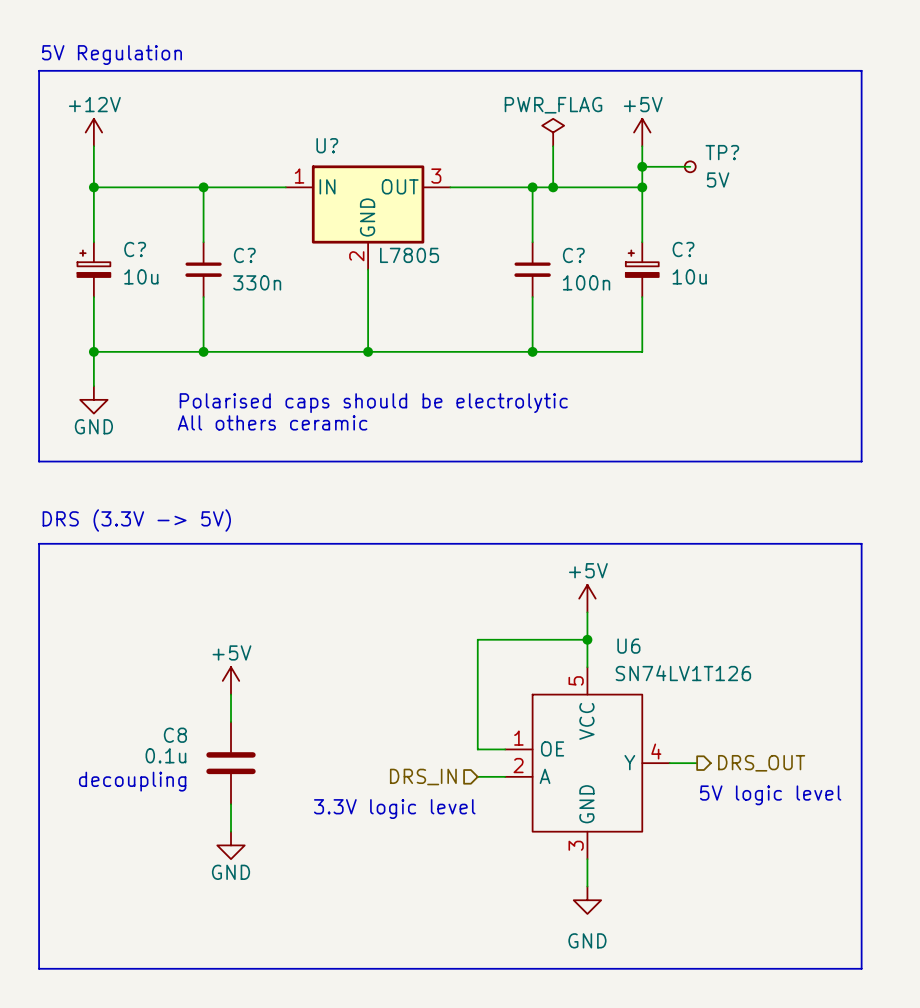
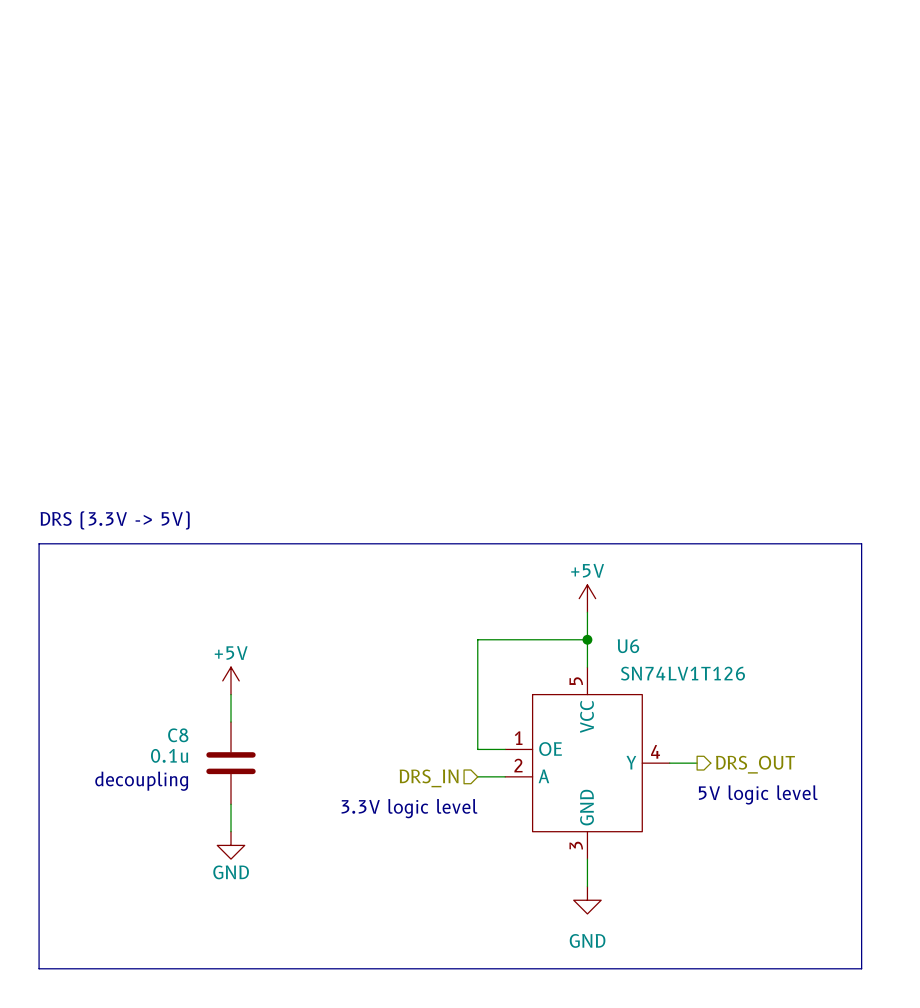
text: 5V Regulation (111, 55) -> none
line: (39, 70) (39, 461) (861, 461) (861, 70) (39, 70) -> none
power symbol: +12V (93, 132) -> none
power symbol: PWR_FLAG (553, 132) -> none
power symbol: +5V (642, 132) -> none
wire: (93, 146) (93, 242) -> none
wire: (553, 146) (553, 187) -> none
wire: (642, 146) (642, 242) -> none
wire: (642, 166) (690, 166) -> none
junction: (642, 166) -> none
TP?: 5V (690, 166) -> none
wire: (93, 187) (285, 187) -> none
junction: (93, 187) -> none
wire: (203, 187) (203, 242) -> none
junction: (203, 187) -> none
wire: (450, 187) (642, 187) -> none
wire: (532, 187) (532, 242) -> none
junction: (532, 187) -> none
junction: (553, 187) -> none
junction: (642, 187) -> none
U?: L7805 (368, 217) -> none
C?: 10u (93, 269) -> none
C?: 330n (203, 269) -> none
wire: (368, 269) (368, 351) -> none
C?: 100n (532, 269) -> none
C?: 10u (642, 269) -> none
wire: (93, 297) (93, 386) -> none
wire: (203, 297) (203, 351) -> none
wire: (532, 297) (532, 351) -> none
wire: (642, 297) (642, 351) (93, 351) -> none
junction: (93, 351) -> none
junction: (203, 351) -> none
junction: (368, 351) -> none
junction: (532, 351) -> none
power symbol: GND (93, 399) -> none
text: Polarised caps should be electrolytic (373, 403) -> none
text: All others ceramic (272, 422) -> none

